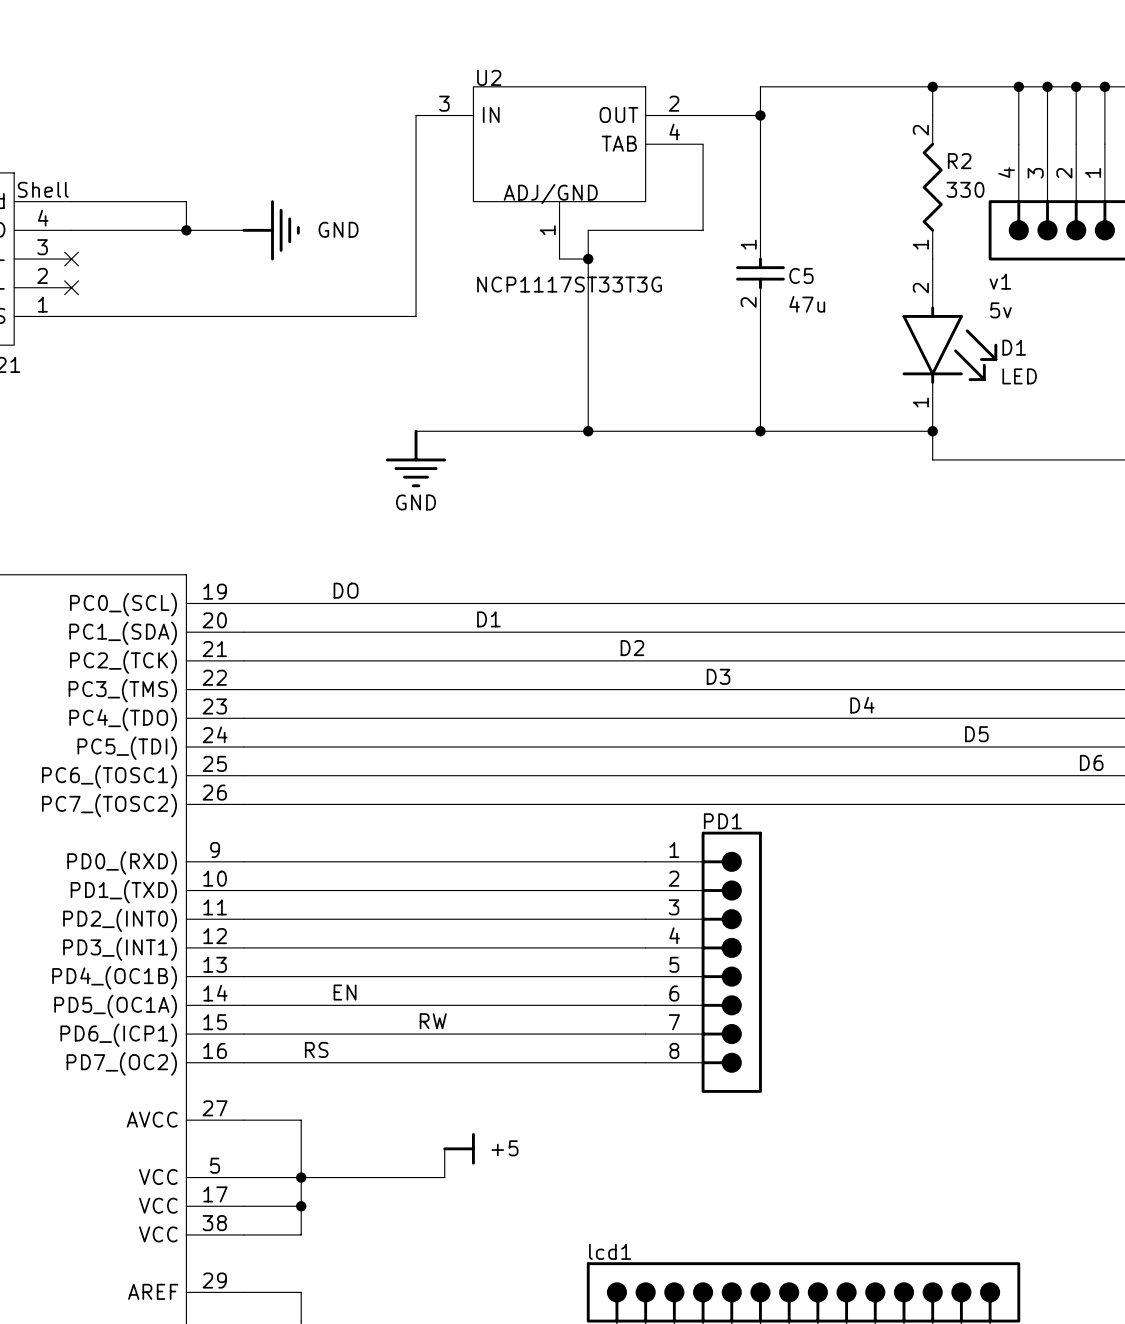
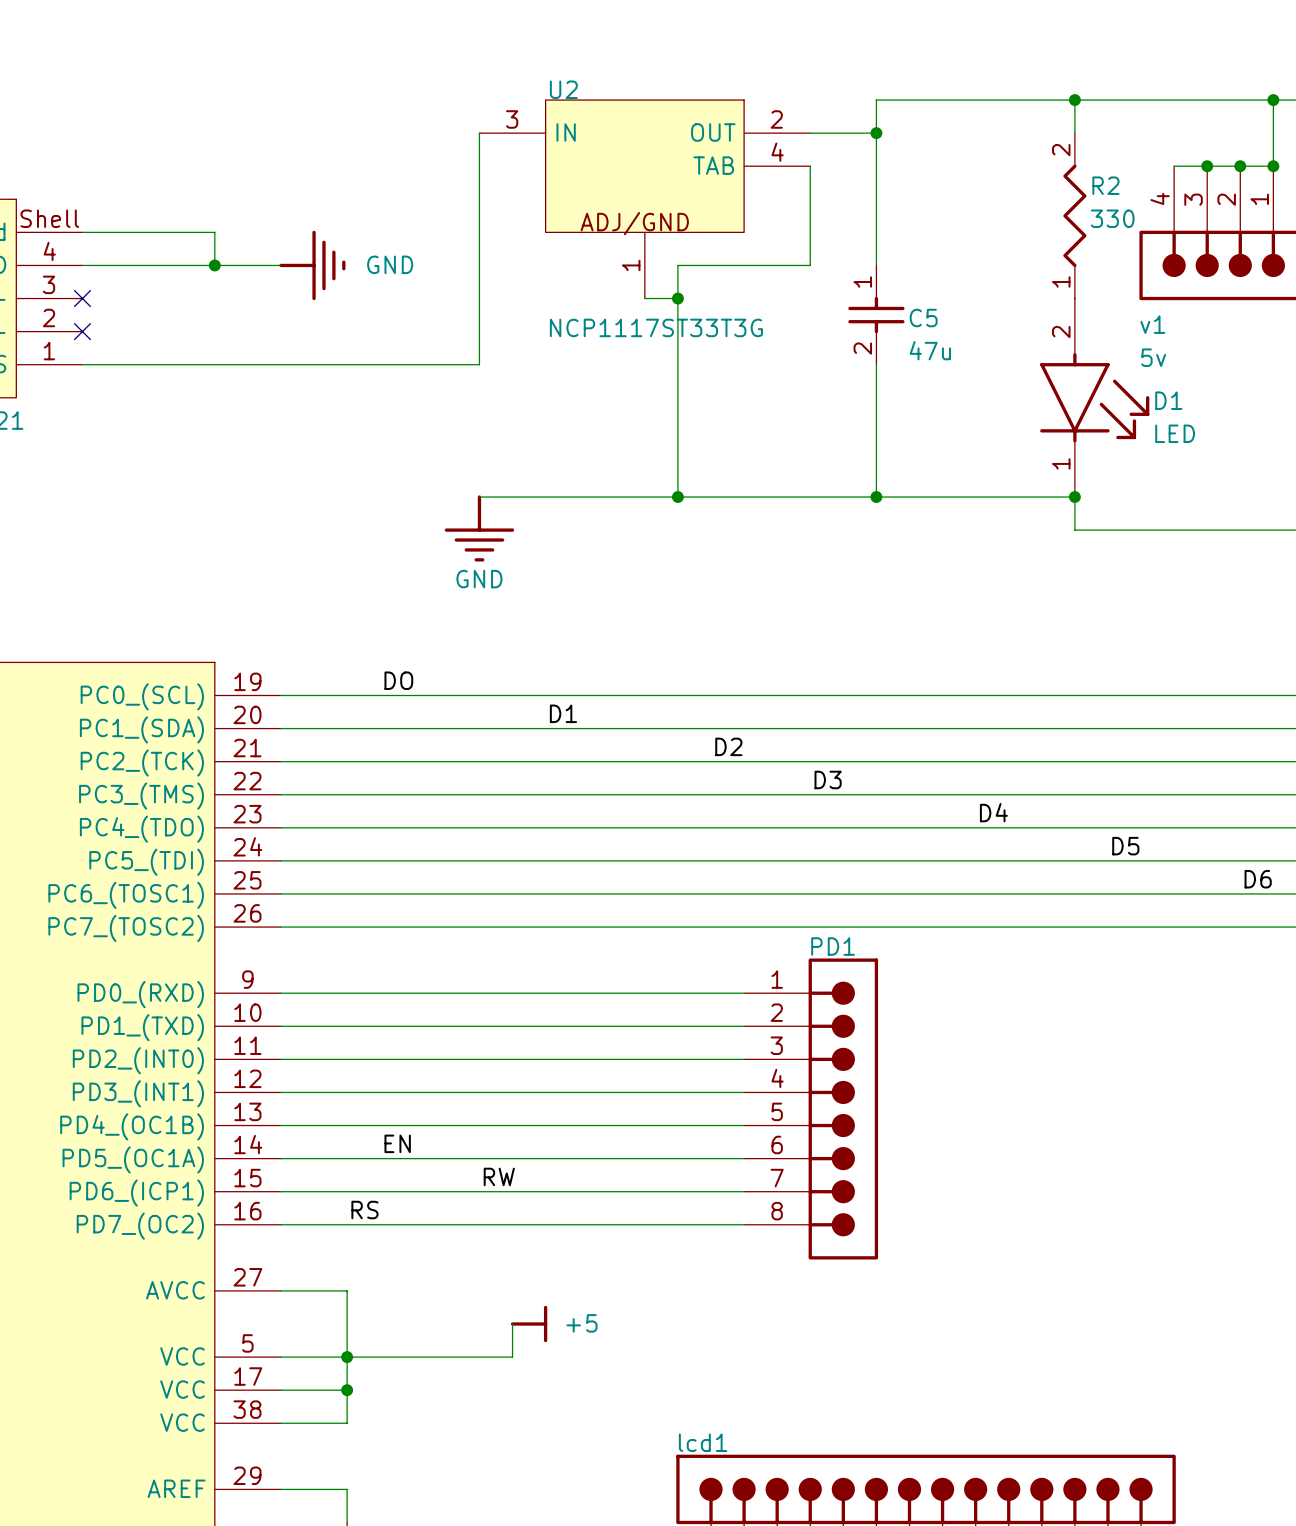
wire: (1018, 86) (1018, 144) -> (1273, 166) (1174, 166)
junction: (1018, 86) -> none
wire: (1047, 86) (1047, 144) -> none
junction: (1047, 86) -> none
wire: (1076, 86) (1076, 144) -> none
junction: (1076, 86) -> none
junction: none -> (1207, 166)
junction: none -> (1240, 166)
junction: none -> (1273, 166)

